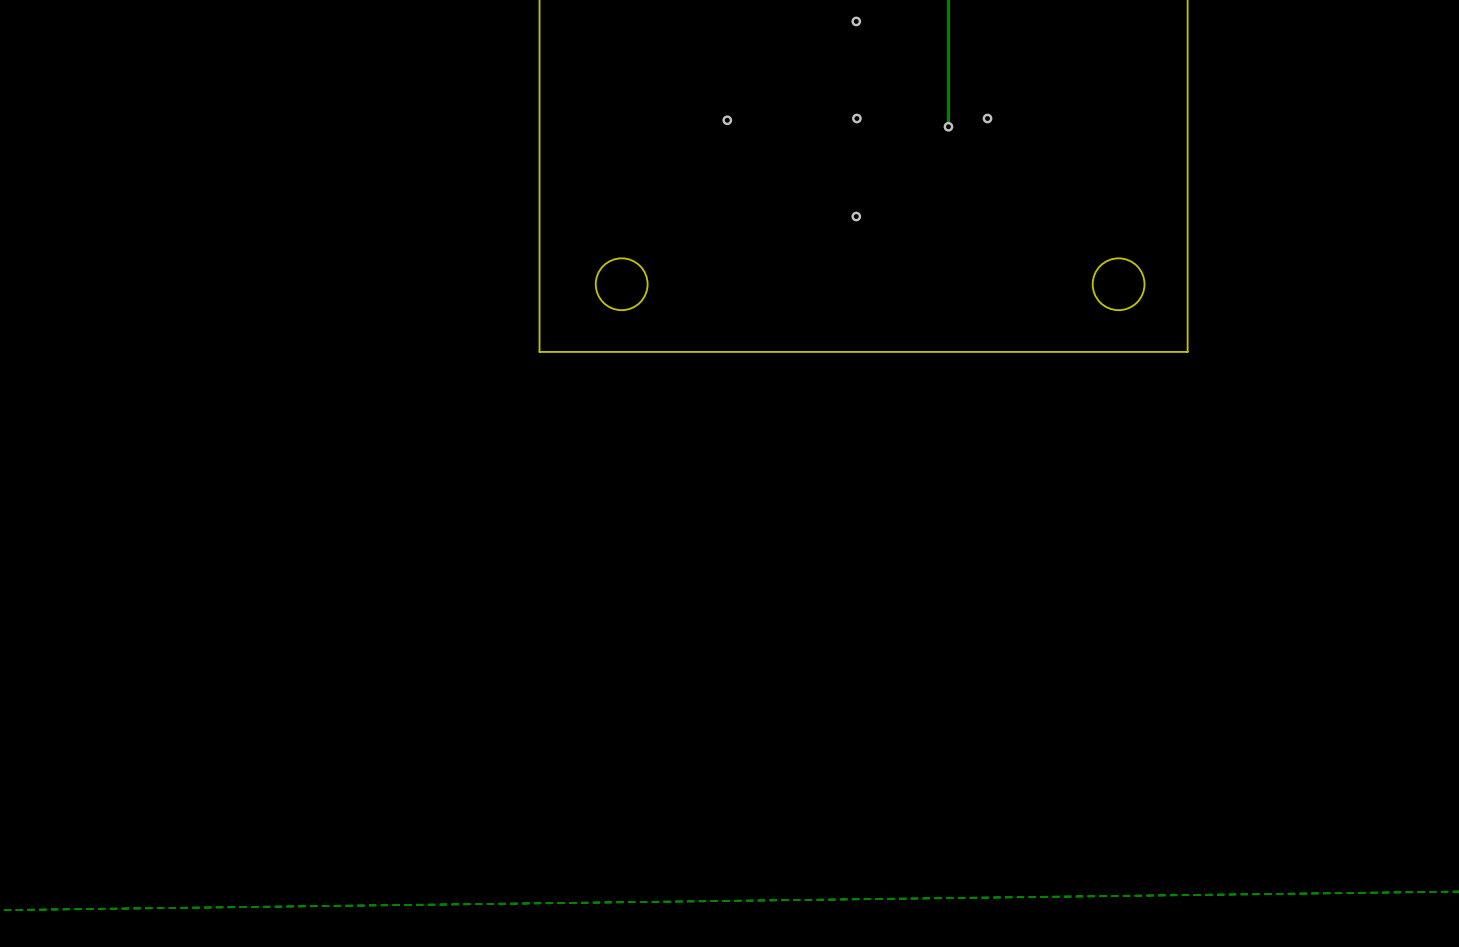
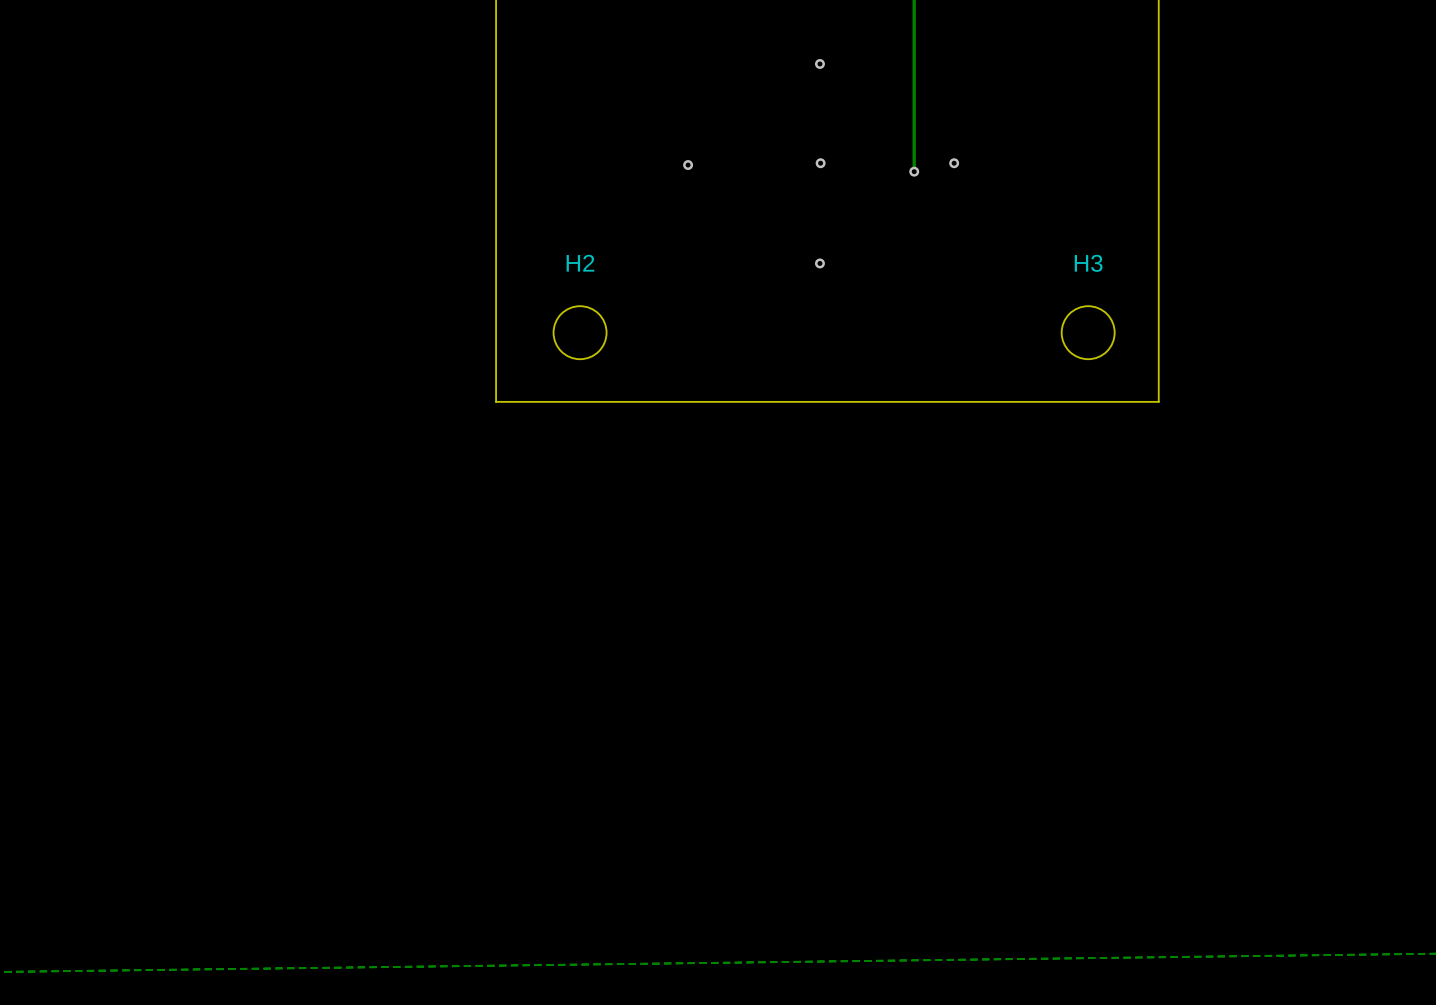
H2 name: none -> H2 (580, 263)
H3 name: none -> H3 (1088, 263)

